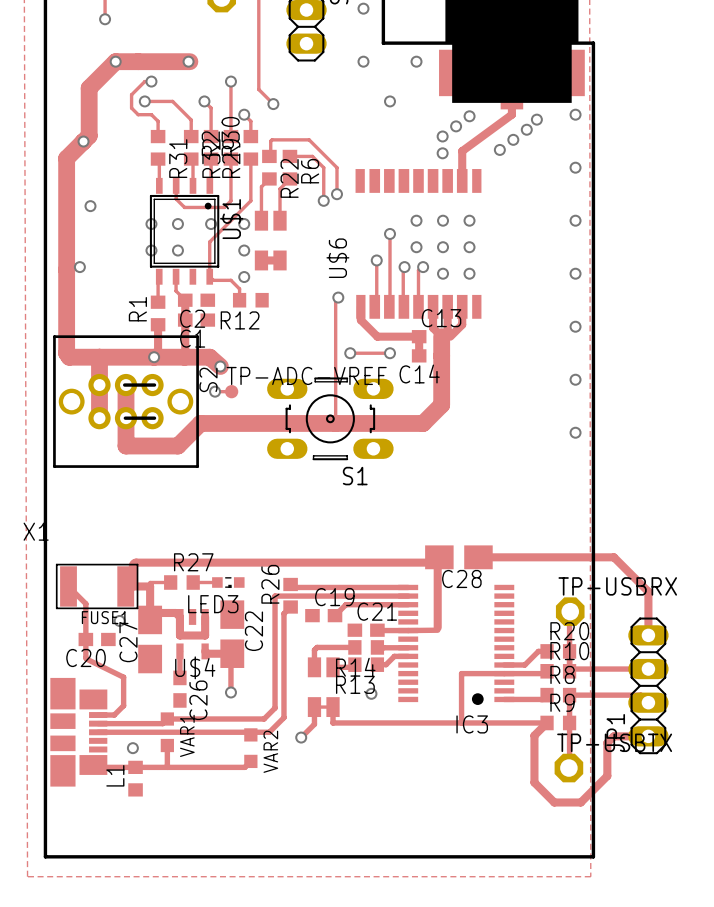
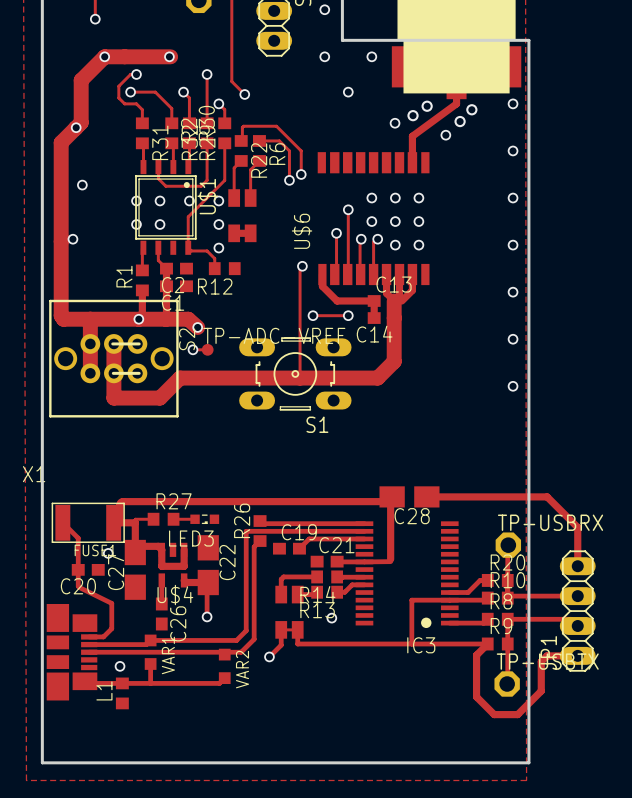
via: (469, 116) -> none
via: none -> (427, 106)
via: (536, 119) -> none
via: none -> (471, 109)
via: (456, 126) -> none
via: none -> (413, 115)
via: (526, 129) -> none
via: none -> (460, 121)
via: (513, 139) -> none
via: (442, 153) -> none

